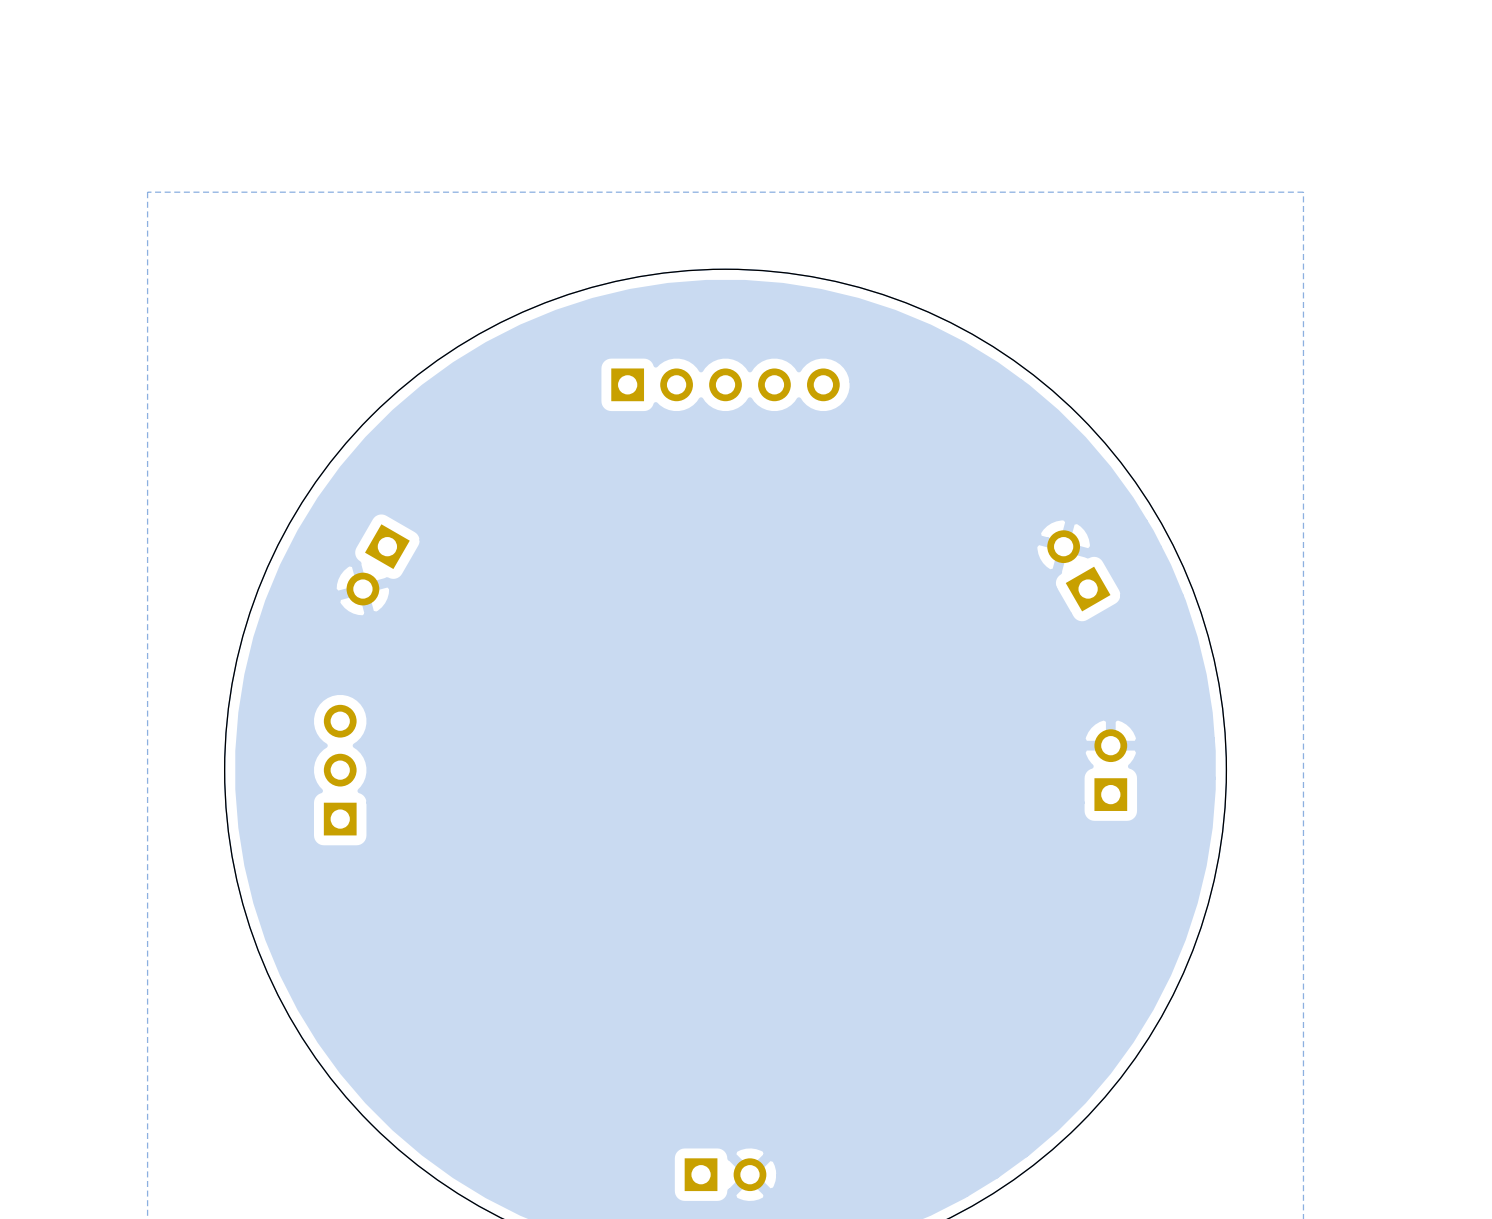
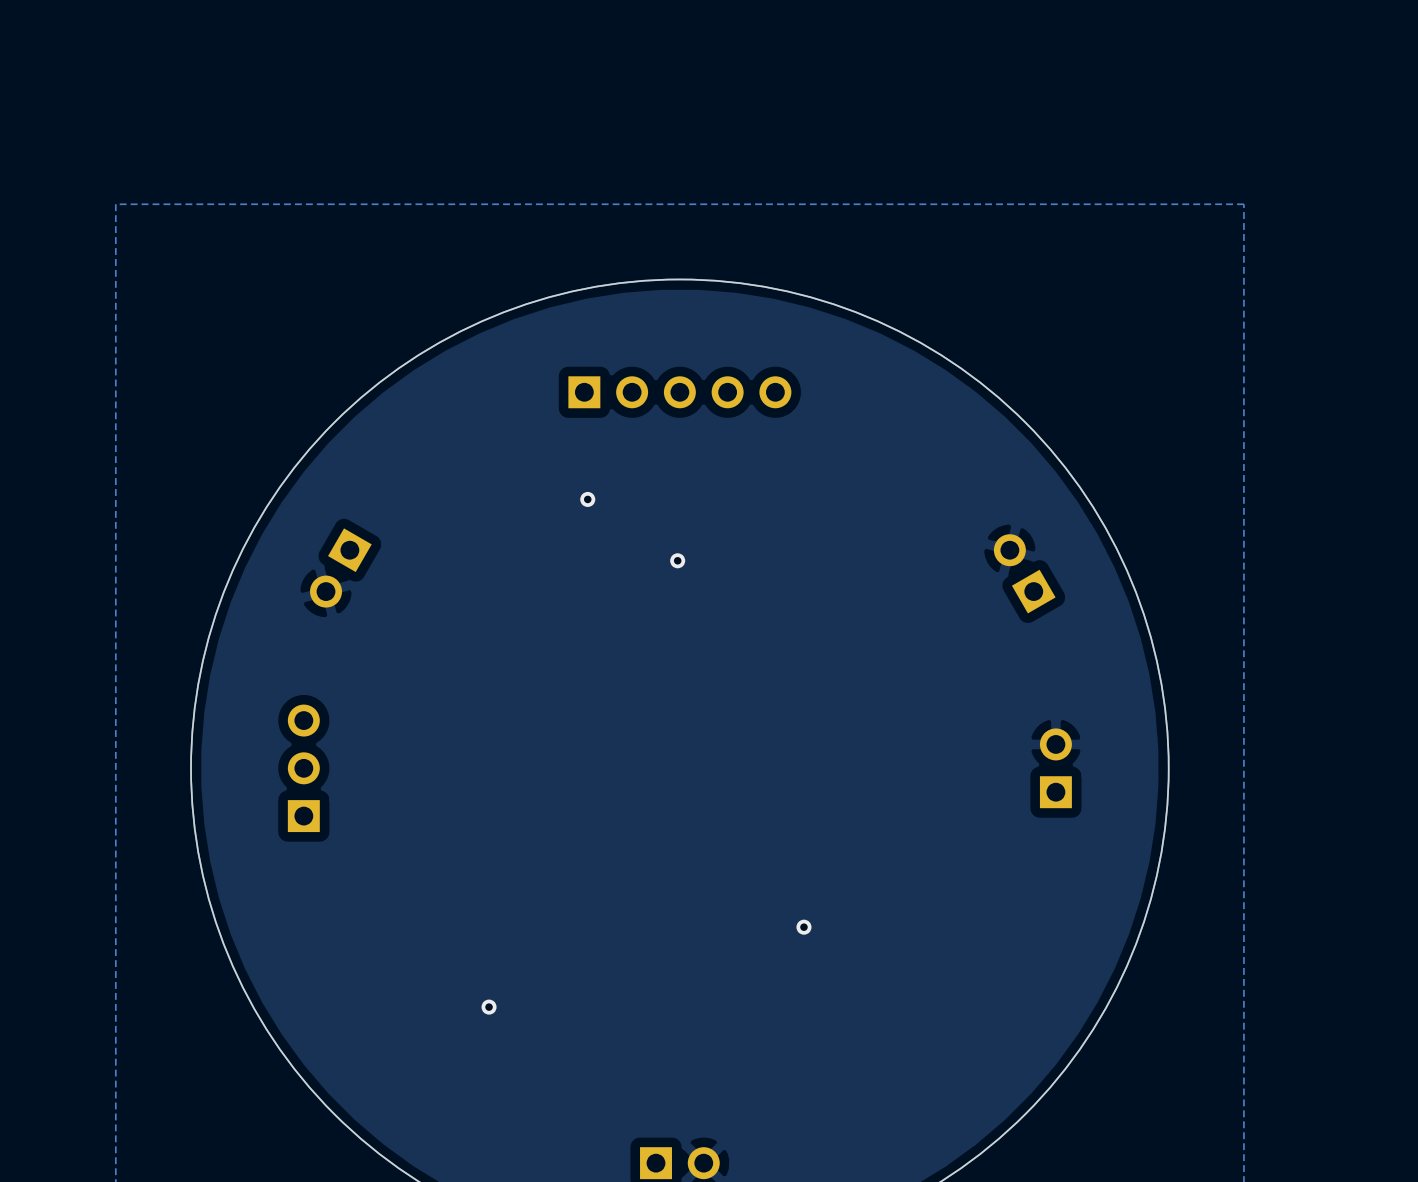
via: none -> (587, 499)
via: none -> (677, 560)
via: none -> (803, 927)
via: none -> (489, 1007)

